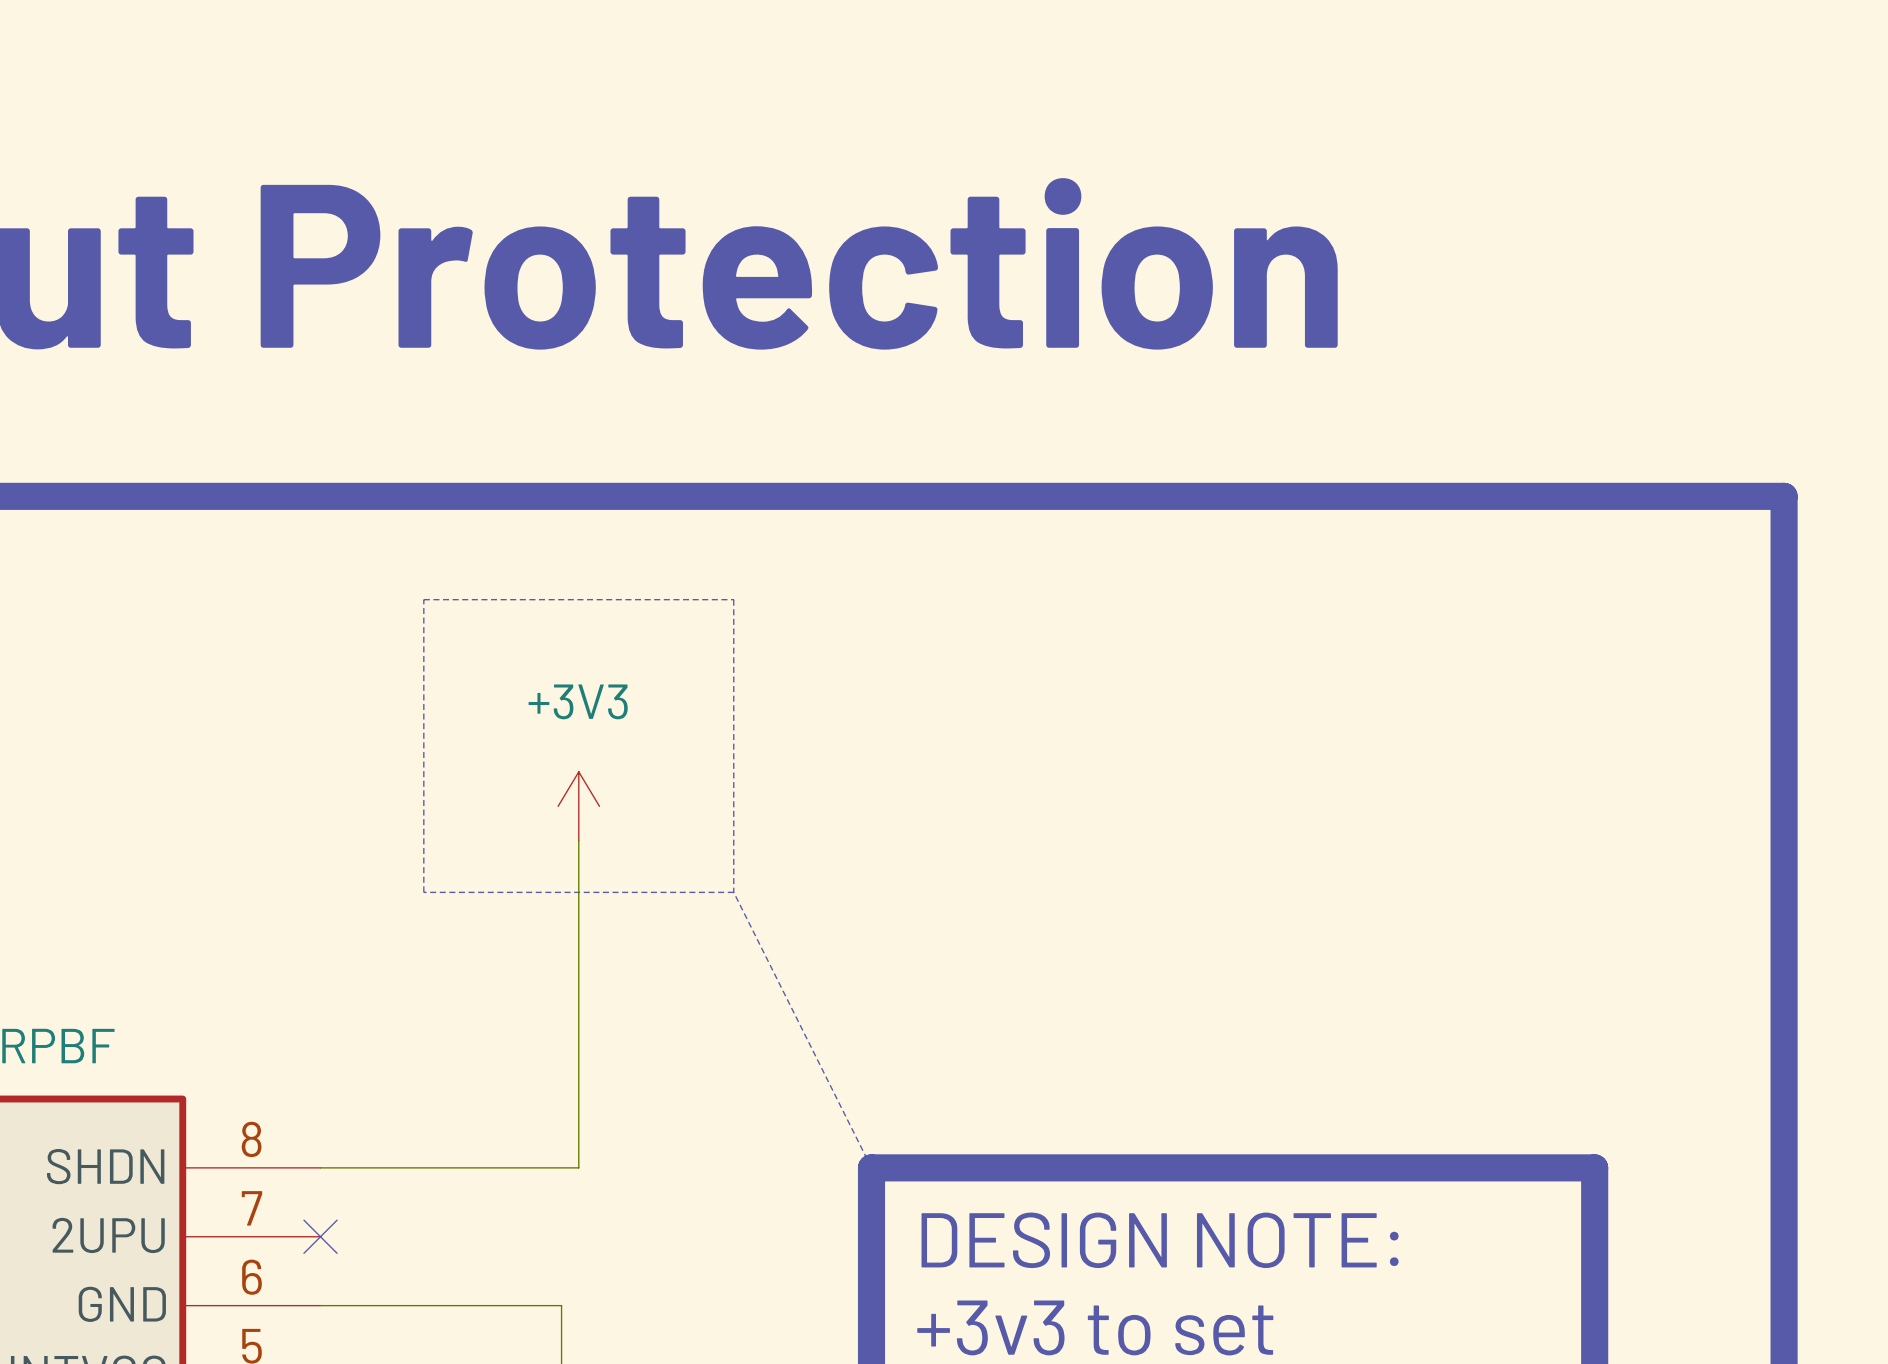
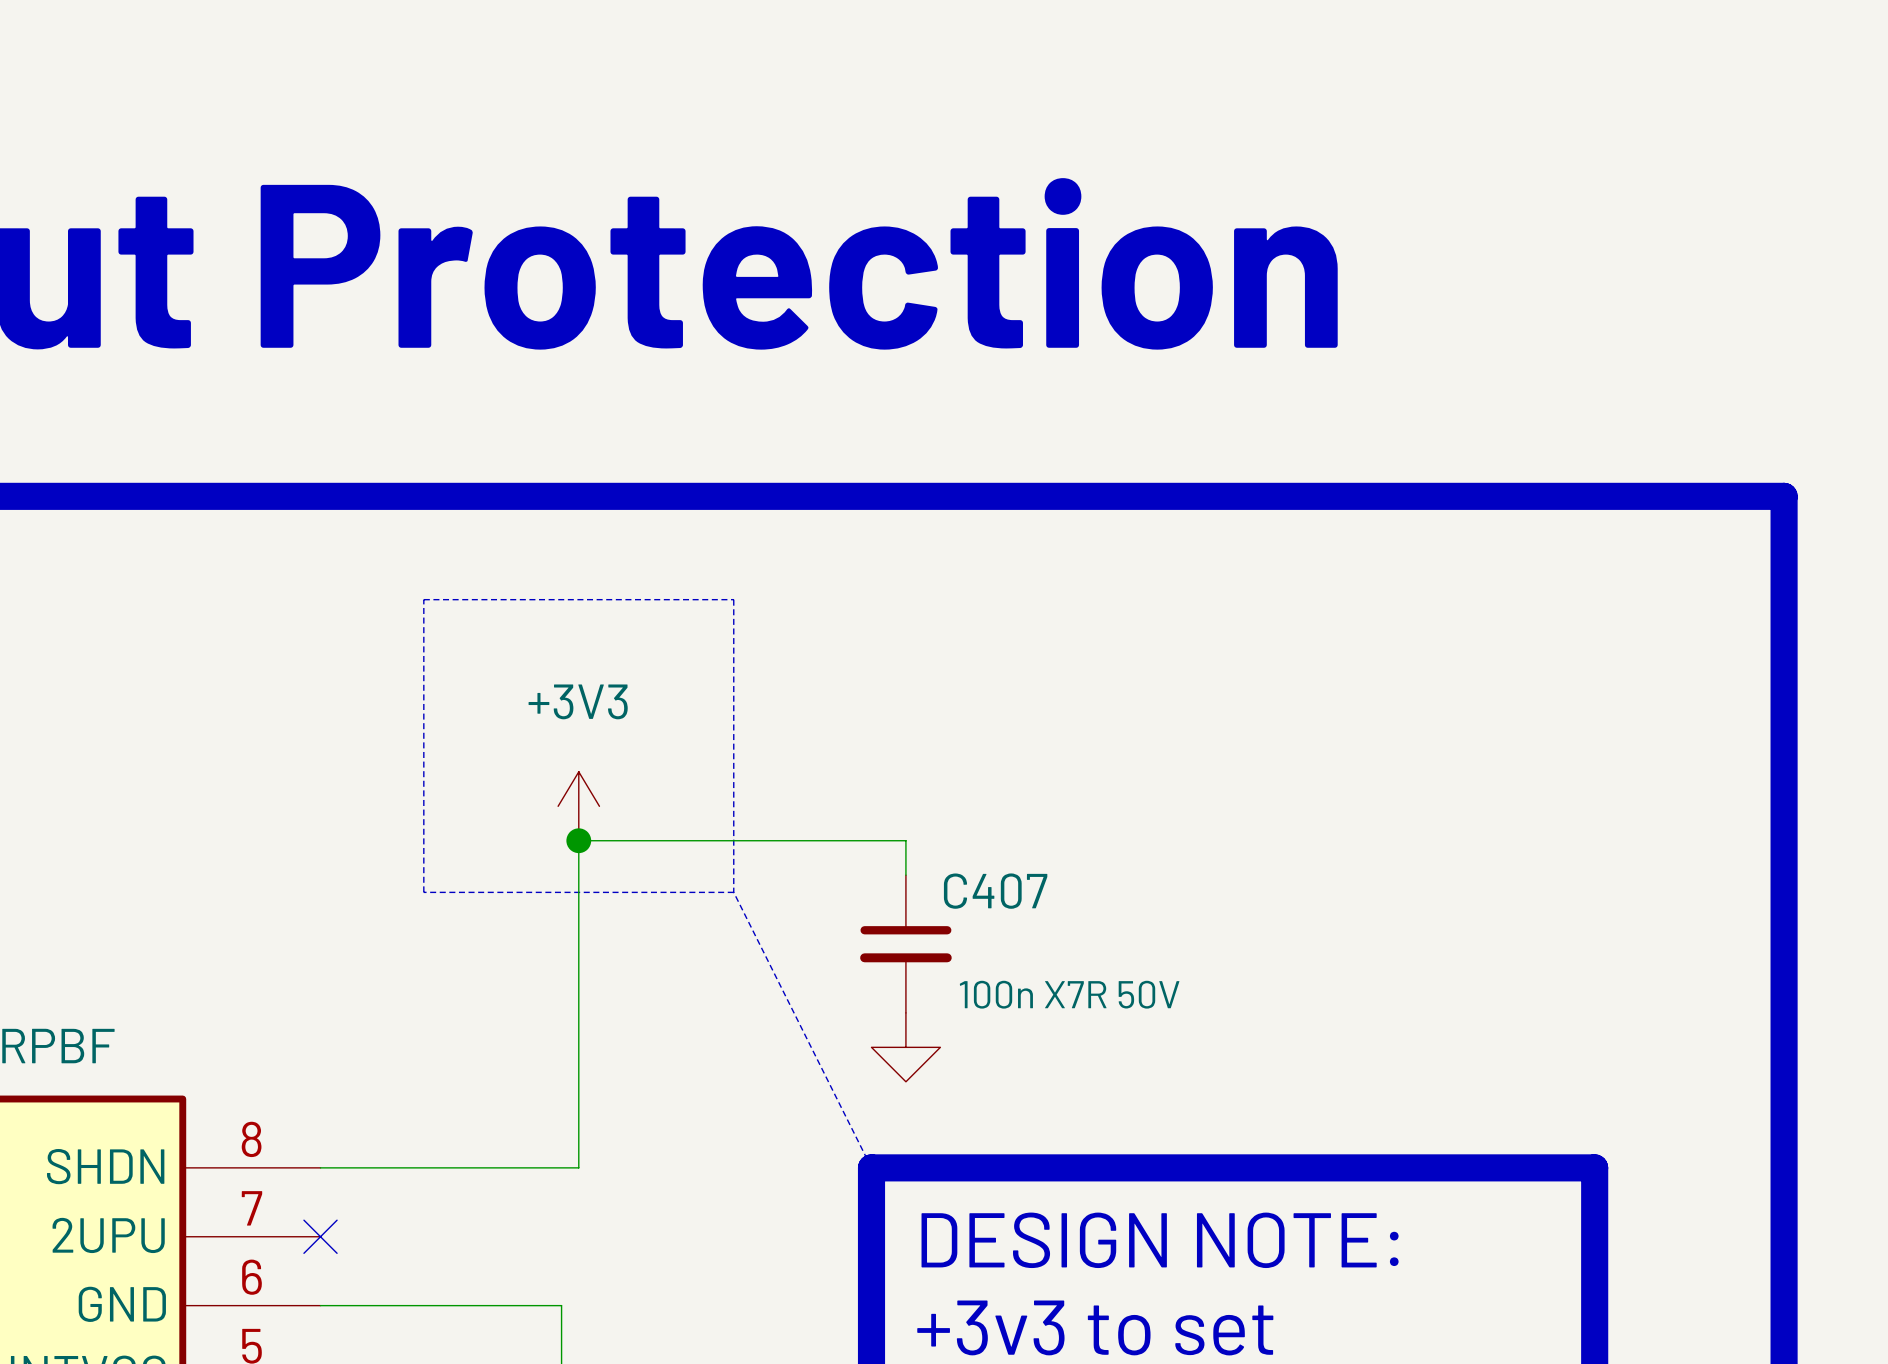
wire: none -> (578, 840) (905, 840) (905, 875)
junction: none -> (578, 840)
C407: none -> 100n X7R 50V (905, 944)
power symbol: none -> (905, 1047)

